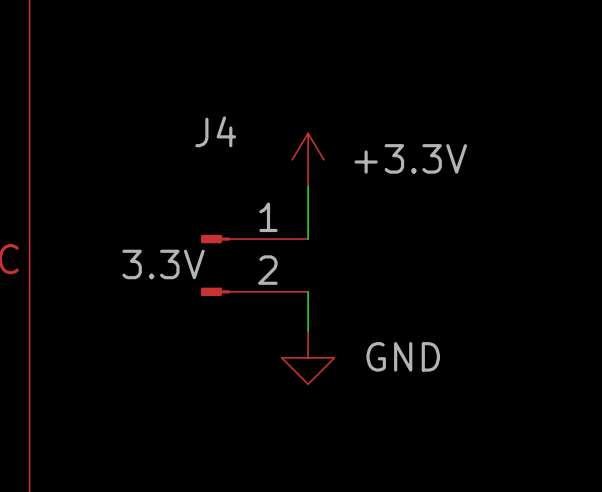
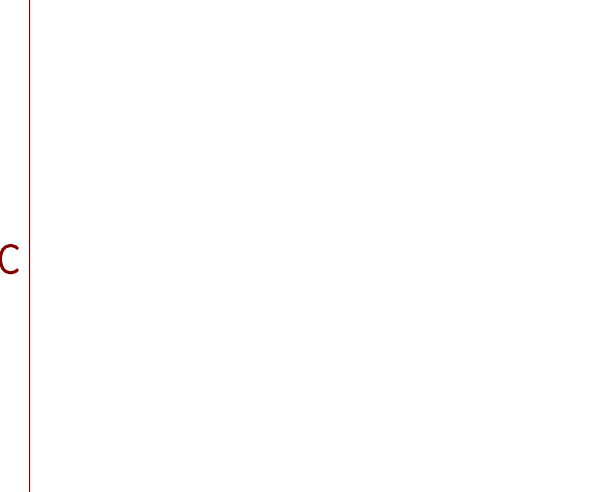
power symbol: +3.3V (308, 159) -> none
wire: (308, 186) (308, 239) -> none
J4: 3.3V (254, 265) -> none
wire: (308, 291) (308, 331) -> none
power symbol: GND (308, 357) -> none

